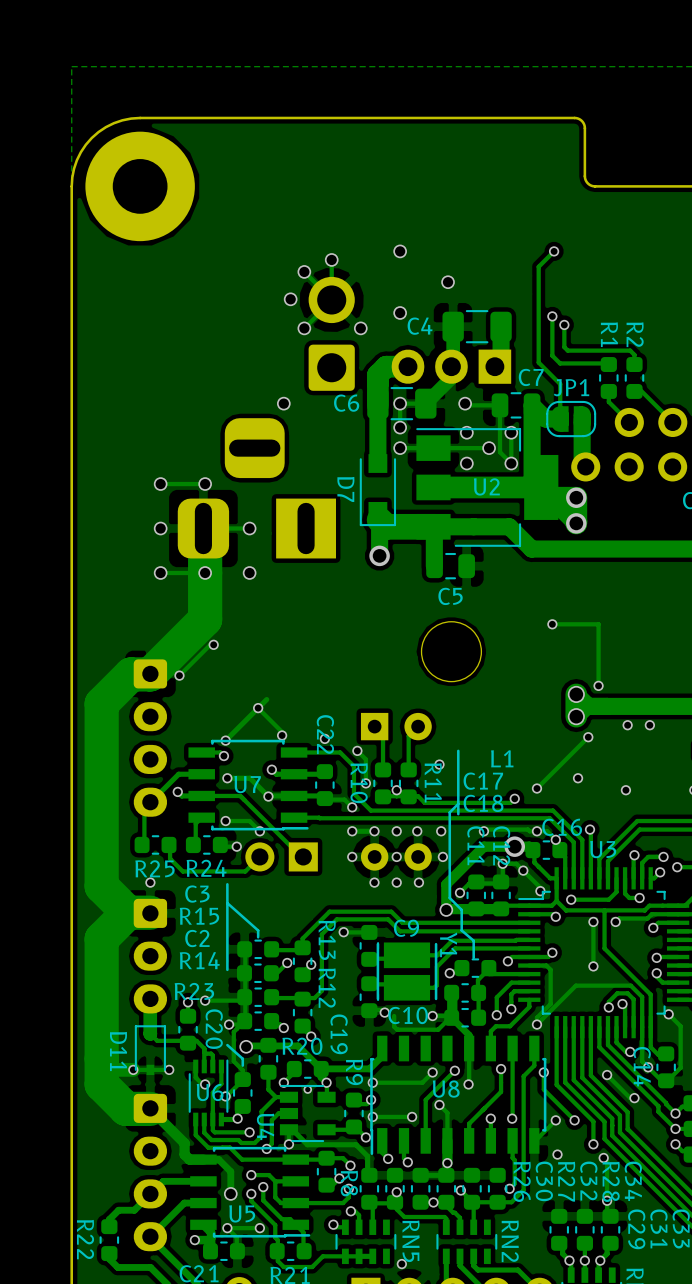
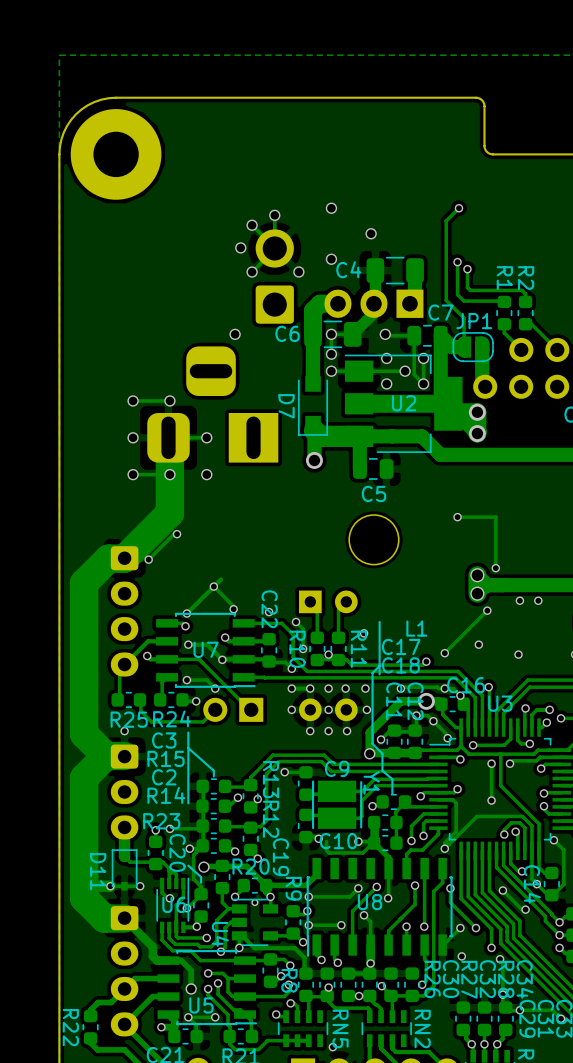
via: none -> (519, 1010)
track: none -> (502, 1010) (552, 1010) (561, 1018)
via: none -> (561, 1018)

